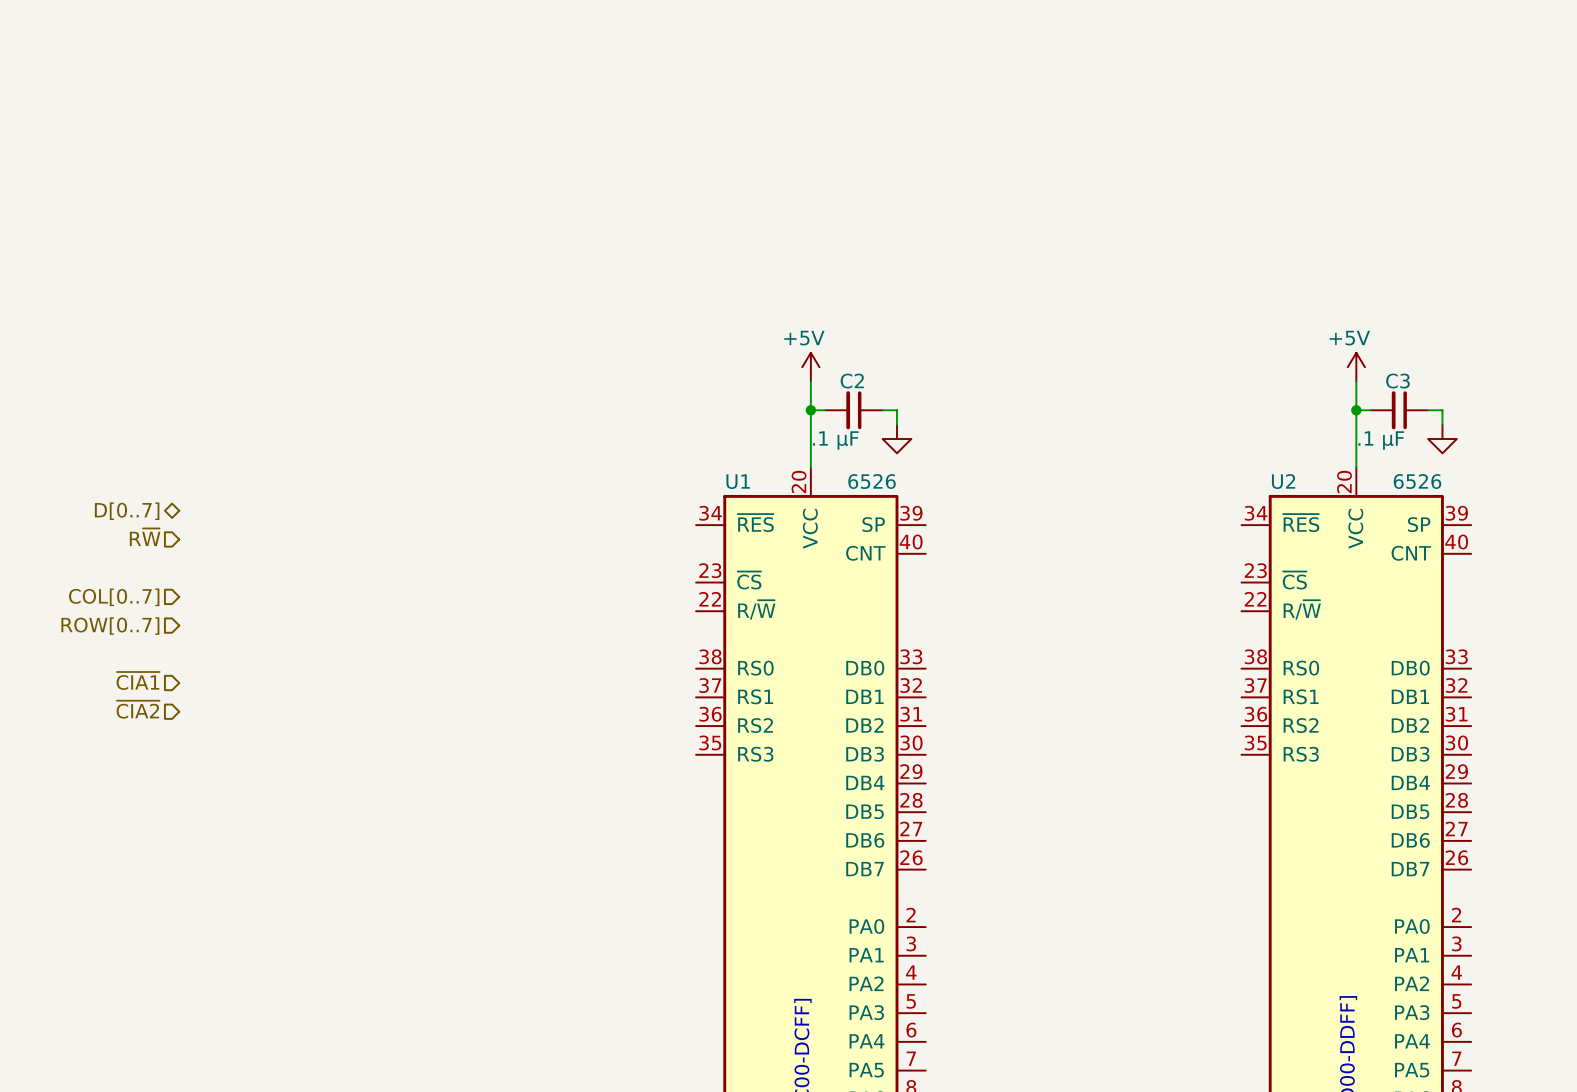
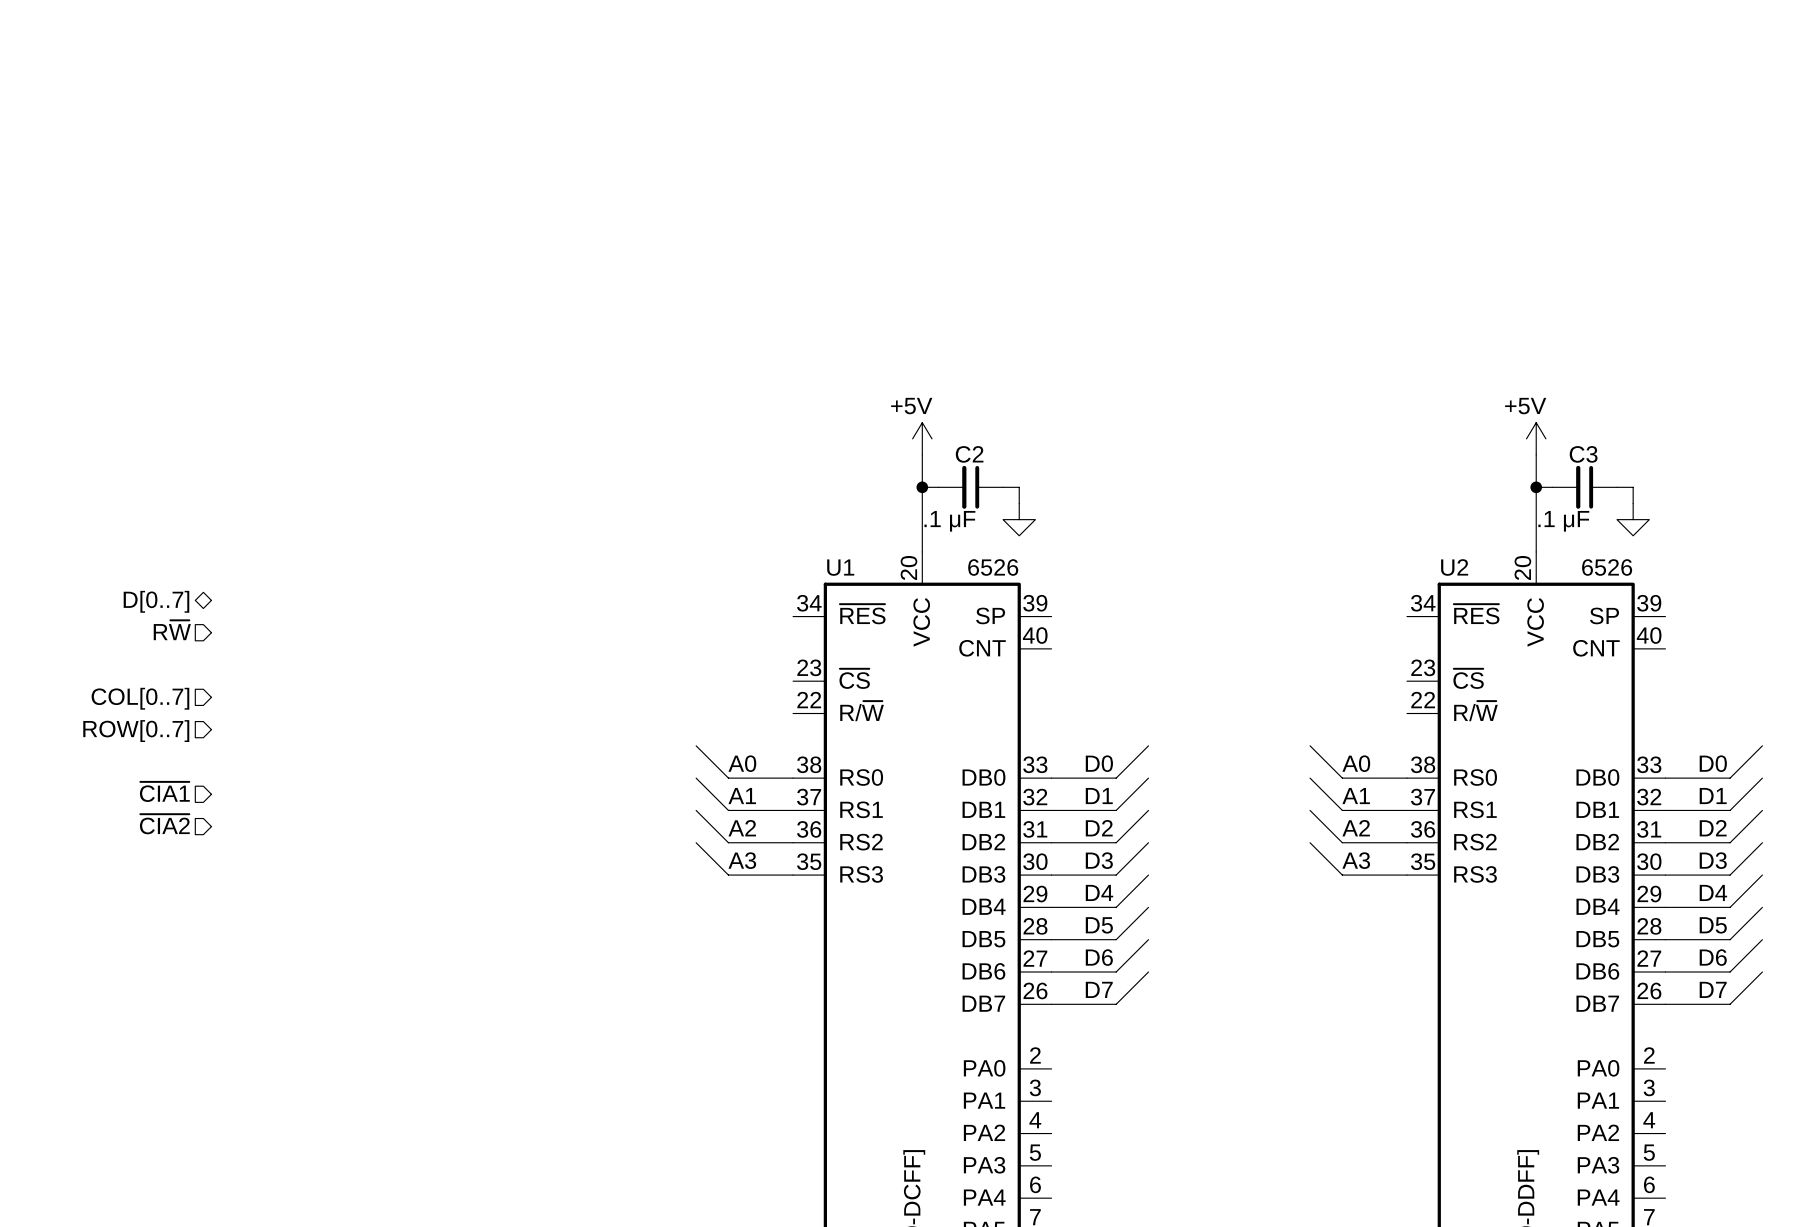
wire: none -> (696, 745) (728, 778) (793, 778)
wire: none -> (1148, 745) (1116, 778) (1051, 778)
wire: none -> (1310, 745) (1342, 778) (1406, 778)
wire: none -> (1762, 745) (1730, 778) (1665, 778)
label: none -> A0 (742, 763)
label: none -> D0 (1099, 763)
label: none -> A0 (1356, 763)
label: none -> D0 (1713, 763)
wire: none -> (696, 778) (728, 810) (793, 810)
wire: none -> (1148, 778) (1116, 810) (1051, 810)
wire: none -> (1310, 778) (1342, 810) (1406, 810)
wire: none -> (1762, 778) (1730, 810) (1665, 810)
label: none -> A1 (742, 796)
label: none -> D1 (1099, 796)
label: none -> A1 (1356, 796)
label: none -> D1 (1713, 796)
wire: none -> (696, 810) (728, 842) (793, 842)
wire: none -> (1148, 810) (1116, 842) (1051, 842)
wire: none -> (1310, 810) (1342, 842) (1406, 842)
wire: none -> (1762, 810) (1730, 842) (1665, 842)
label: none -> A2 (742, 828)
label: none -> D2 (1099, 828)
label: none -> A2 (1356, 828)
label: none -> D2 (1713, 828)
wire: none -> (696, 842) (728, 875) (793, 875)
wire: none -> (1148, 842) (1116, 875) (1051, 875)
wire: none -> (1310, 842) (1342, 875) (1406, 875)
wire: none -> (1762, 842) (1730, 875) (1665, 875)
label: none -> A3 (742, 860)
label: none -> D3 (1099, 860)
label: none -> A3 (1356, 860)
label: none -> D3 (1713, 860)
wire: none -> (1148, 875) (1116, 907) (1051, 907)
wire: none -> (1762, 875) (1730, 907) (1665, 907)
label: none -> D4 (1099, 892)
label: none -> D4 (1713, 892)
wire: none -> (1148, 907) (1116, 939) (1051, 939)
wire: none -> (1762, 907) (1730, 939) (1665, 939)
label: none -> D5 (1099, 925)
label: none -> D5 (1713, 925)
wire: none -> (1148, 939) (1116, 971) (1051, 971)
wire: none -> (1762, 939) (1730, 971) (1665, 971)
label: none -> D6 (1099, 957)
label: none -> D6 (1713, 957)
wire: none -> (1148, 971) (1116, 1004) (1051, 1004)
wire: none -> (1762, 971) (1730, 1004) (1665, 1004)
label: none -> D7 (1099, 989)
label: none -> D7 (1713, 989)

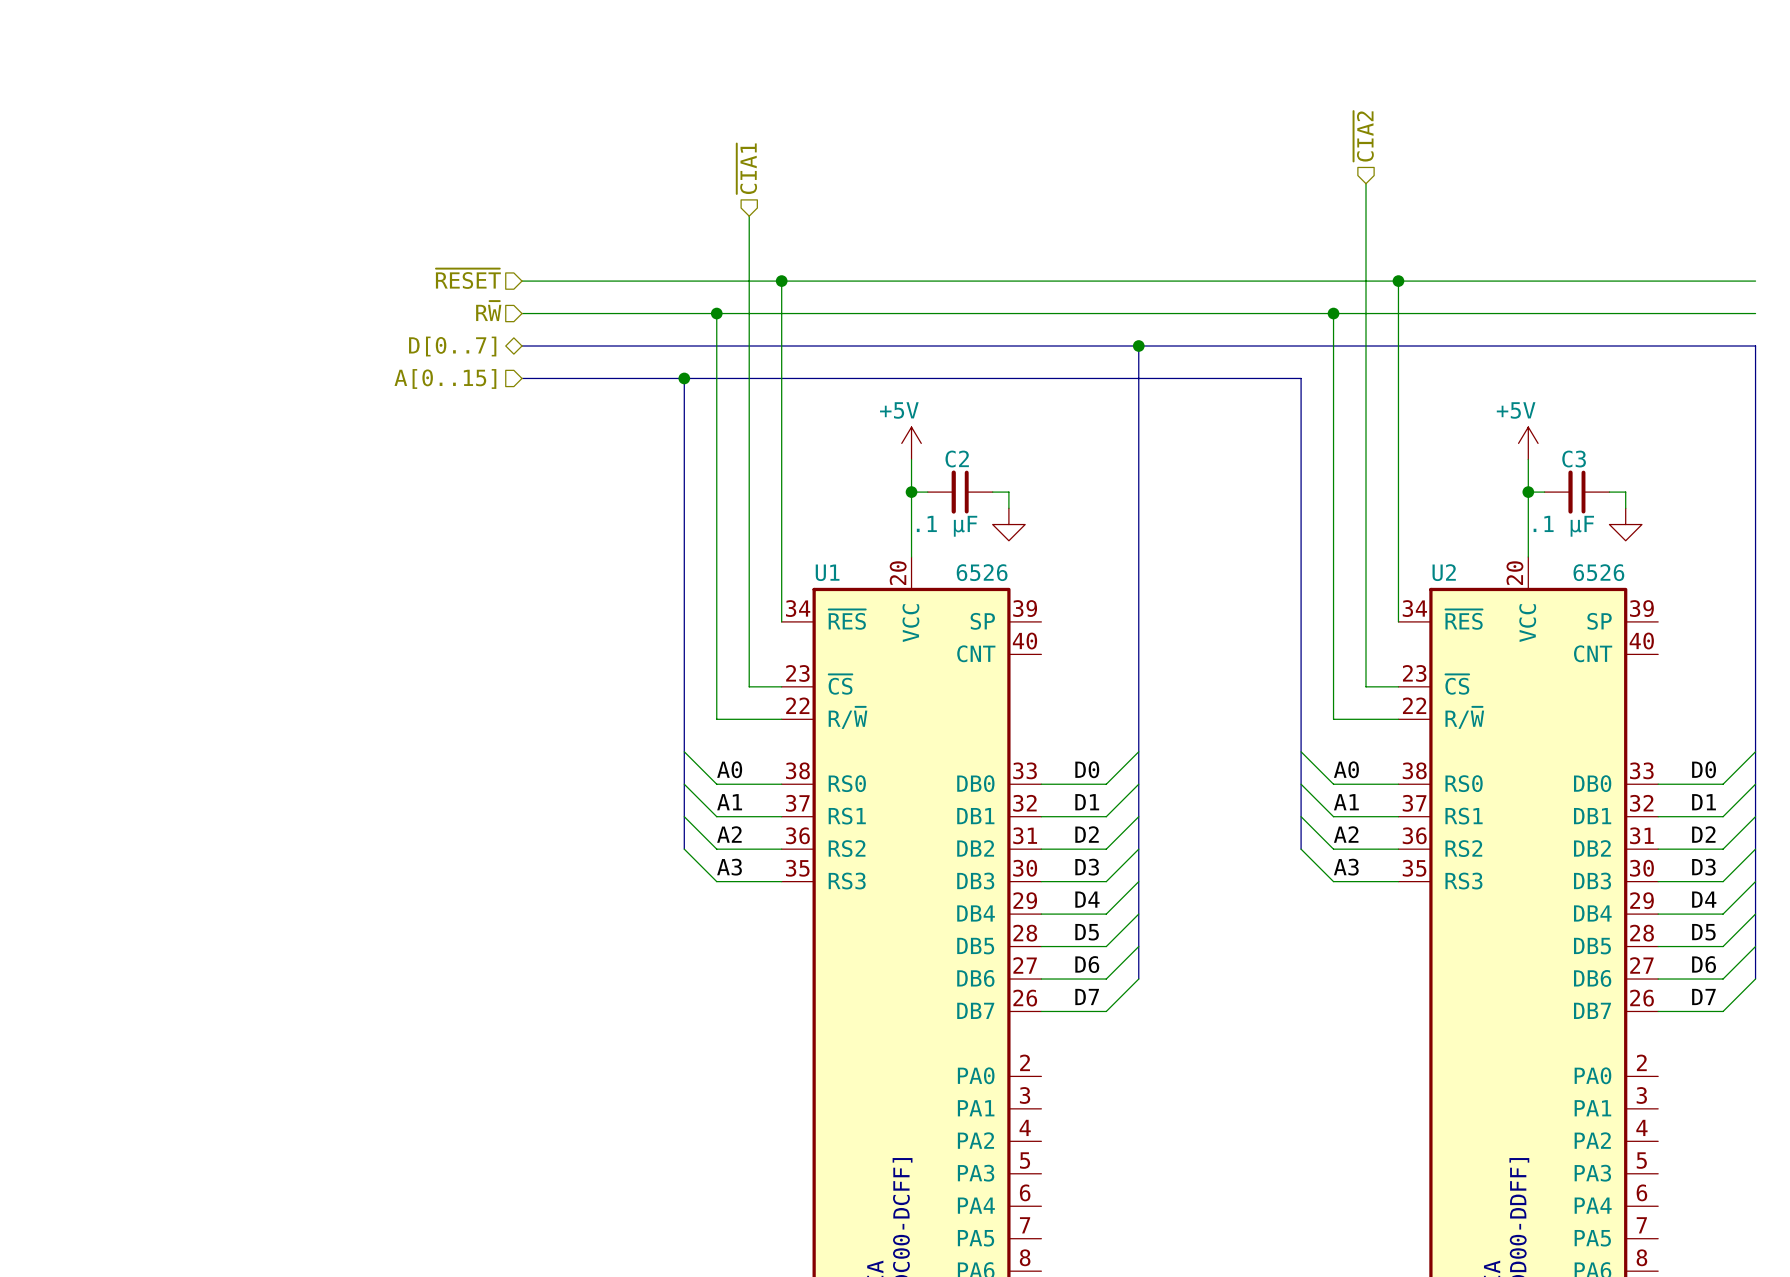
hierarchical label: none -> ~{CIA2} (1363, 136)
hierarchical label: none -> ~{CIA1} (746, 168)
wire: none -> (1366, 183) (1366, 686) (1398, 686)
wire: none -> (749, 216) (749, 686) (781, 686)
hierarchical label: none -> ~{RESET} (468, 278)
wire: none -> (521, 281) (1755, 281)
wire: none -> (781, 281) (781, 621)
junction: none -> (781, 281)
wire: none -> (1398, 281) (1398, 621)
junction: none -> (1398, 281)
hierarchical label: none -> R~{W} (488, 311)
wire: none -> (521, 313) (1755, 313)
wire: none -> (716, 313) (716, 719) (781, 719)
junction: none -> (716, 313)
wire: none -> (1333, 313) (1333, 719) (1398, 719)
junction: none -> (1333, 313)
bus: none -> (521, 346) (1755, 346) (1755, 979)
bus: none -> (1138, 346) (1138, 979)
junction: none -> (1138, 346)
hierarchical label: none -> D[0..7] (452, 346)
bus: none -> (521, 378) (1301, 378) (1301, 849)
bus: none -> (684, 378) (684, 849)
junction: none -> (684, 378)
hierarchical label: none -> A[0..15] (445, 378)
hierarchical label: D[0..7] (156, 601) -> none
hierarchical label: R~{W} (172, 630) -> none
hierarchical label: COL[0..7] (140, 698) -> none
hierarchical label: ROW[0..7] (136, 731) -> none
hierarchical label: ~{CIA1} (164, 791) -> none
hierarchical label: ~{CIA2} (164, 824) -> none

